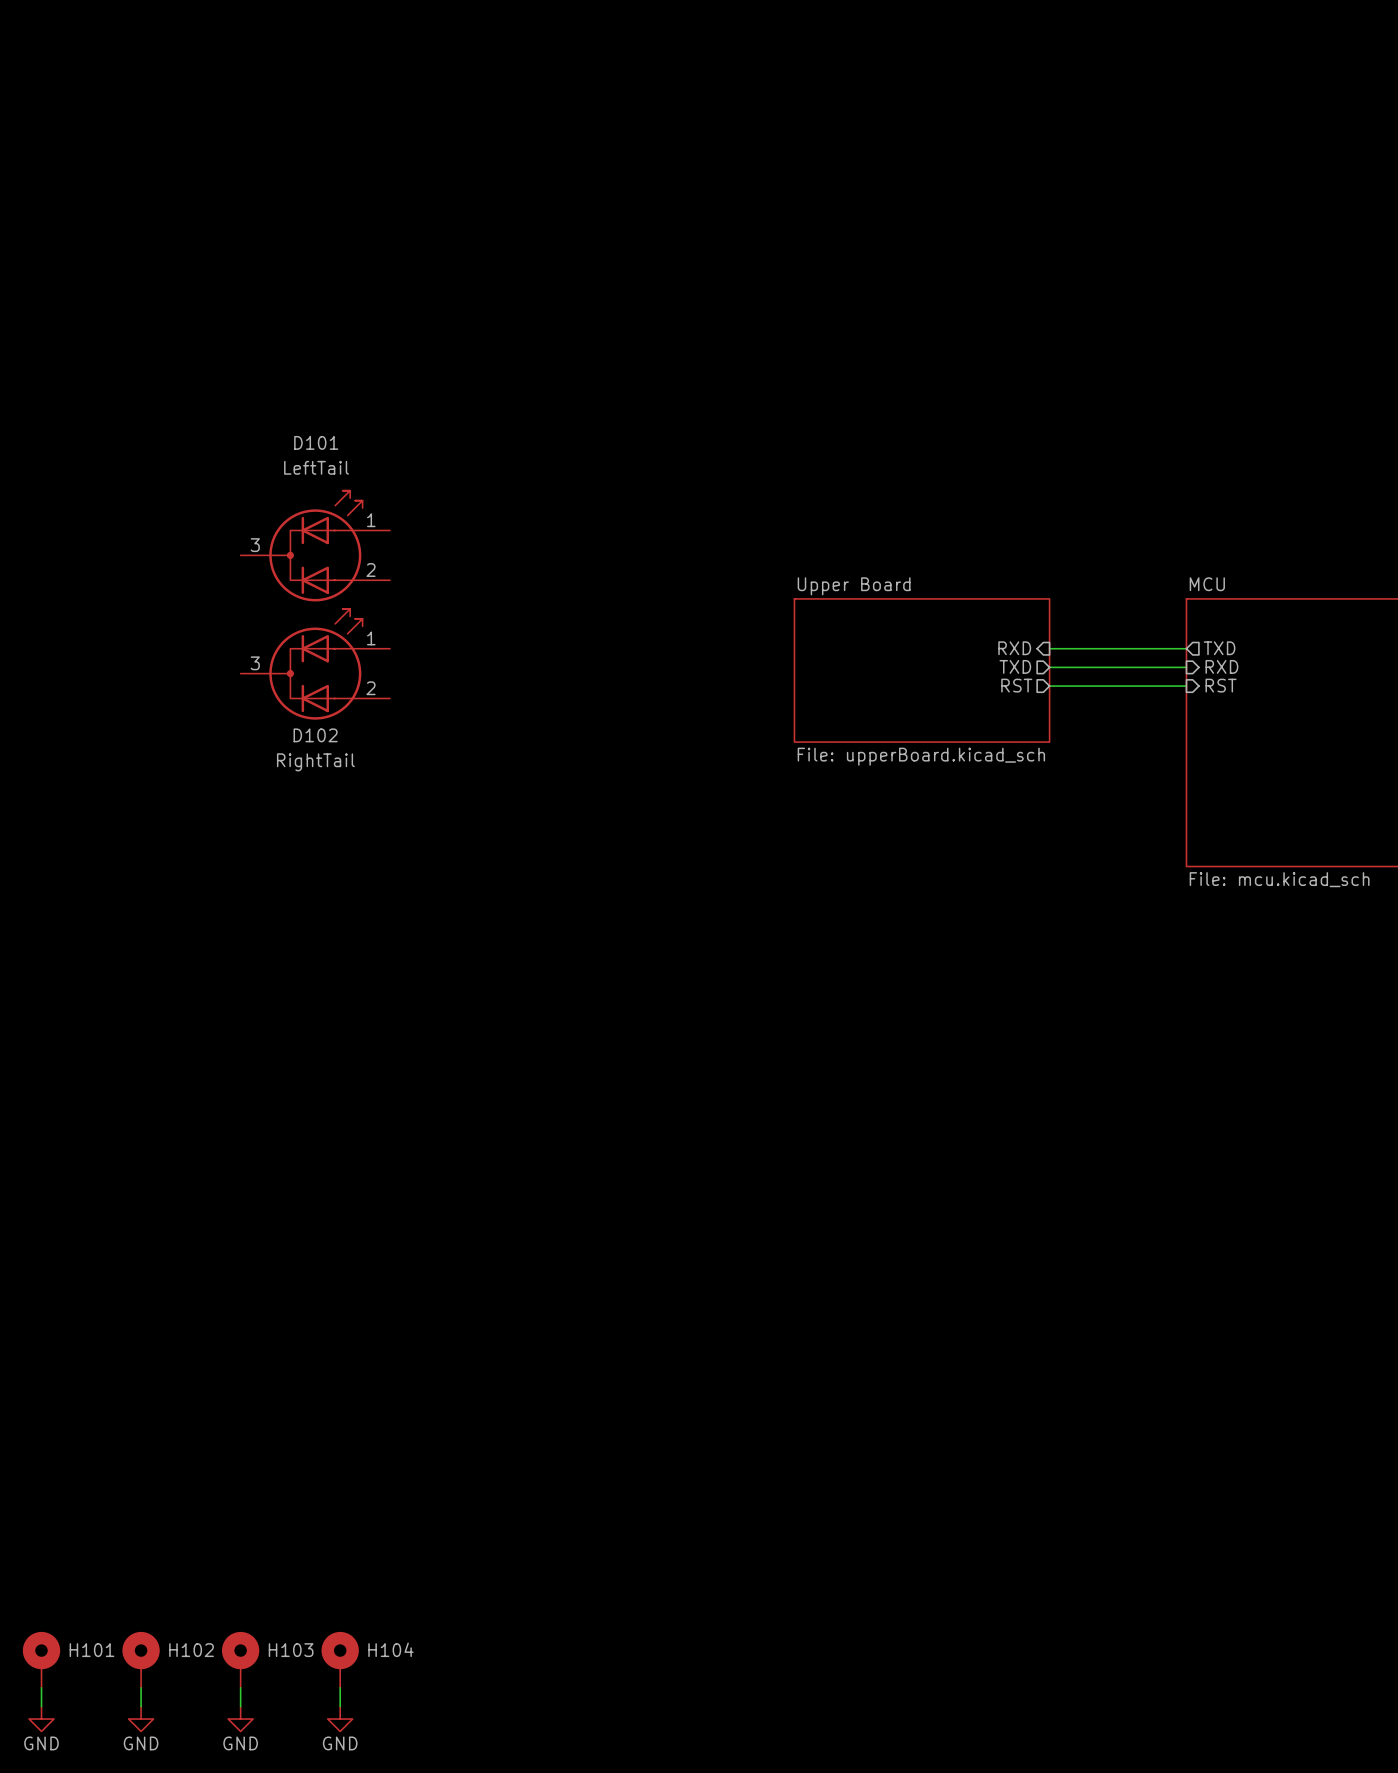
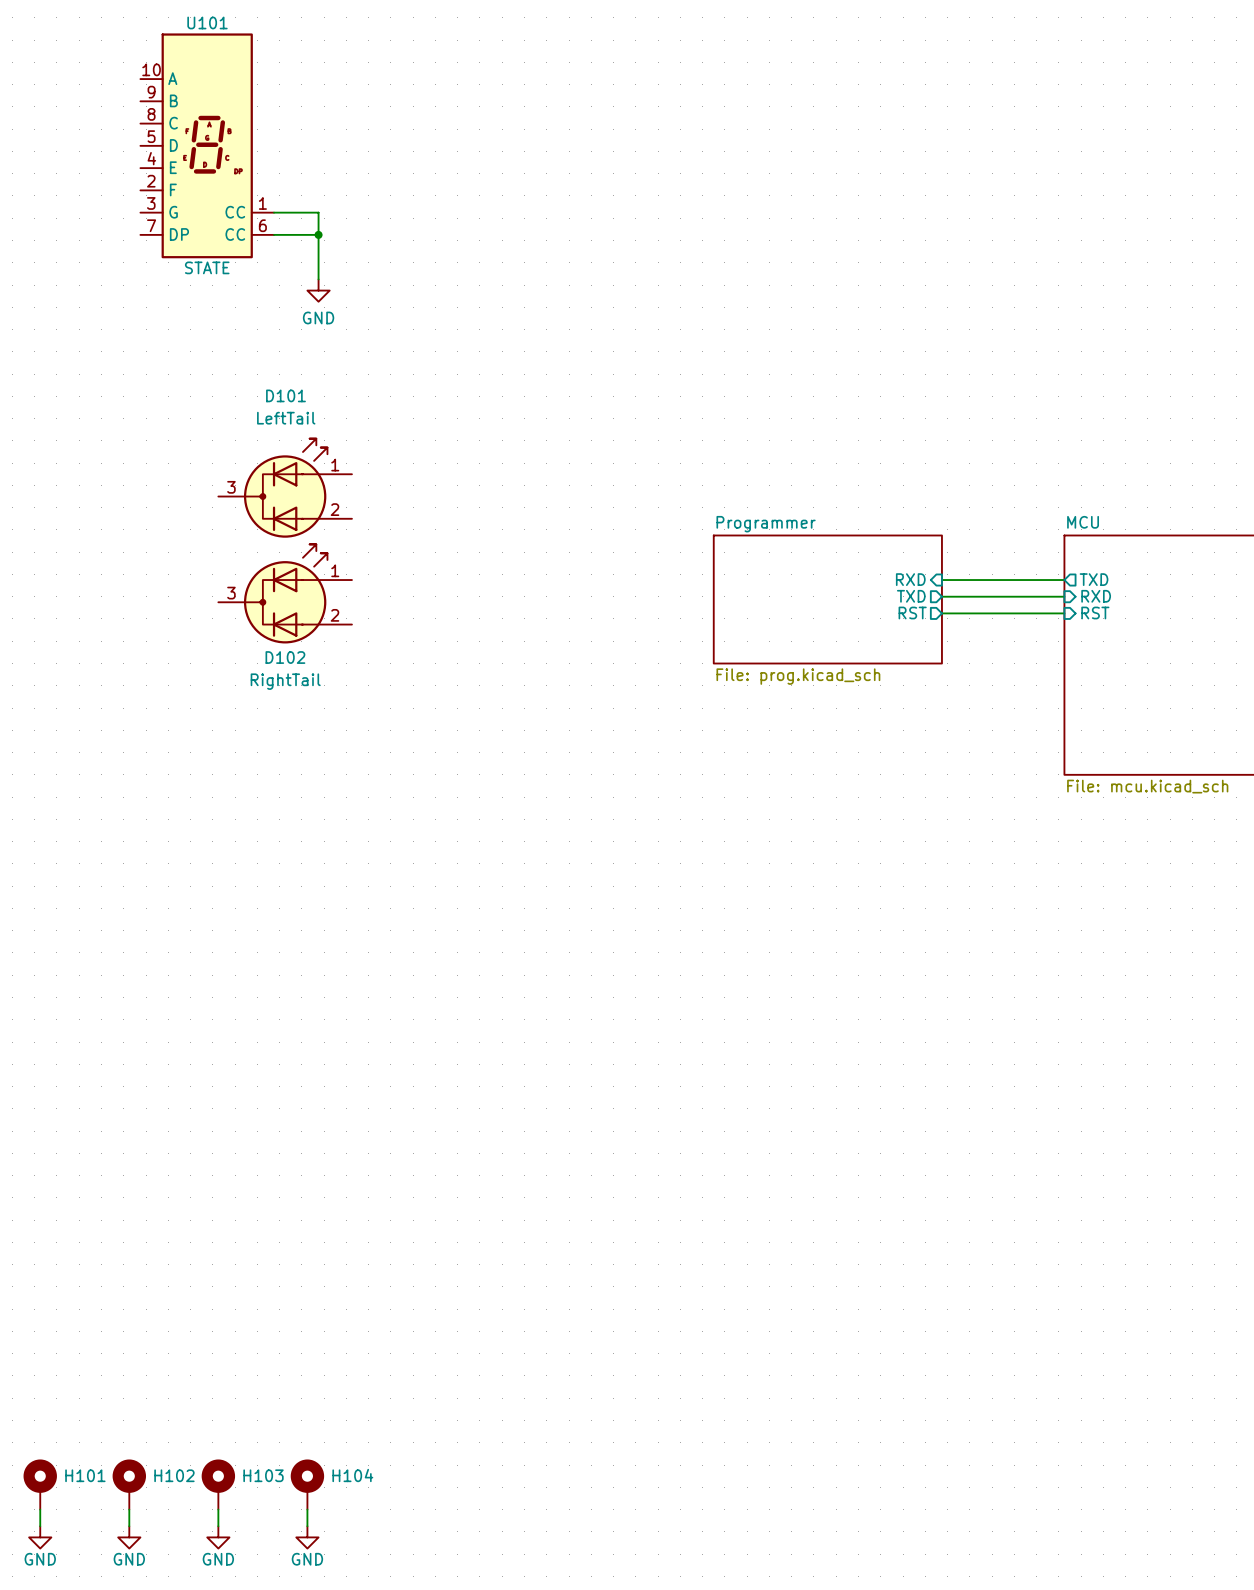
U101: none -> STATE (207, 145)
wire: none -> (274, 212) (318, 212) (318, 279)
wire: none -> (274, 234) (318, 234)
junction: none -> (318, 234)
power symbol: none -> GND (318, 290)
sheet Upper Board name: Upper Board (854, 586) -> Programmer (766, 524)
sheet Upper Board value: File: upperBoard.kicad_sch (921, 756) -> File: prog.kicad_sch (798, 676)

